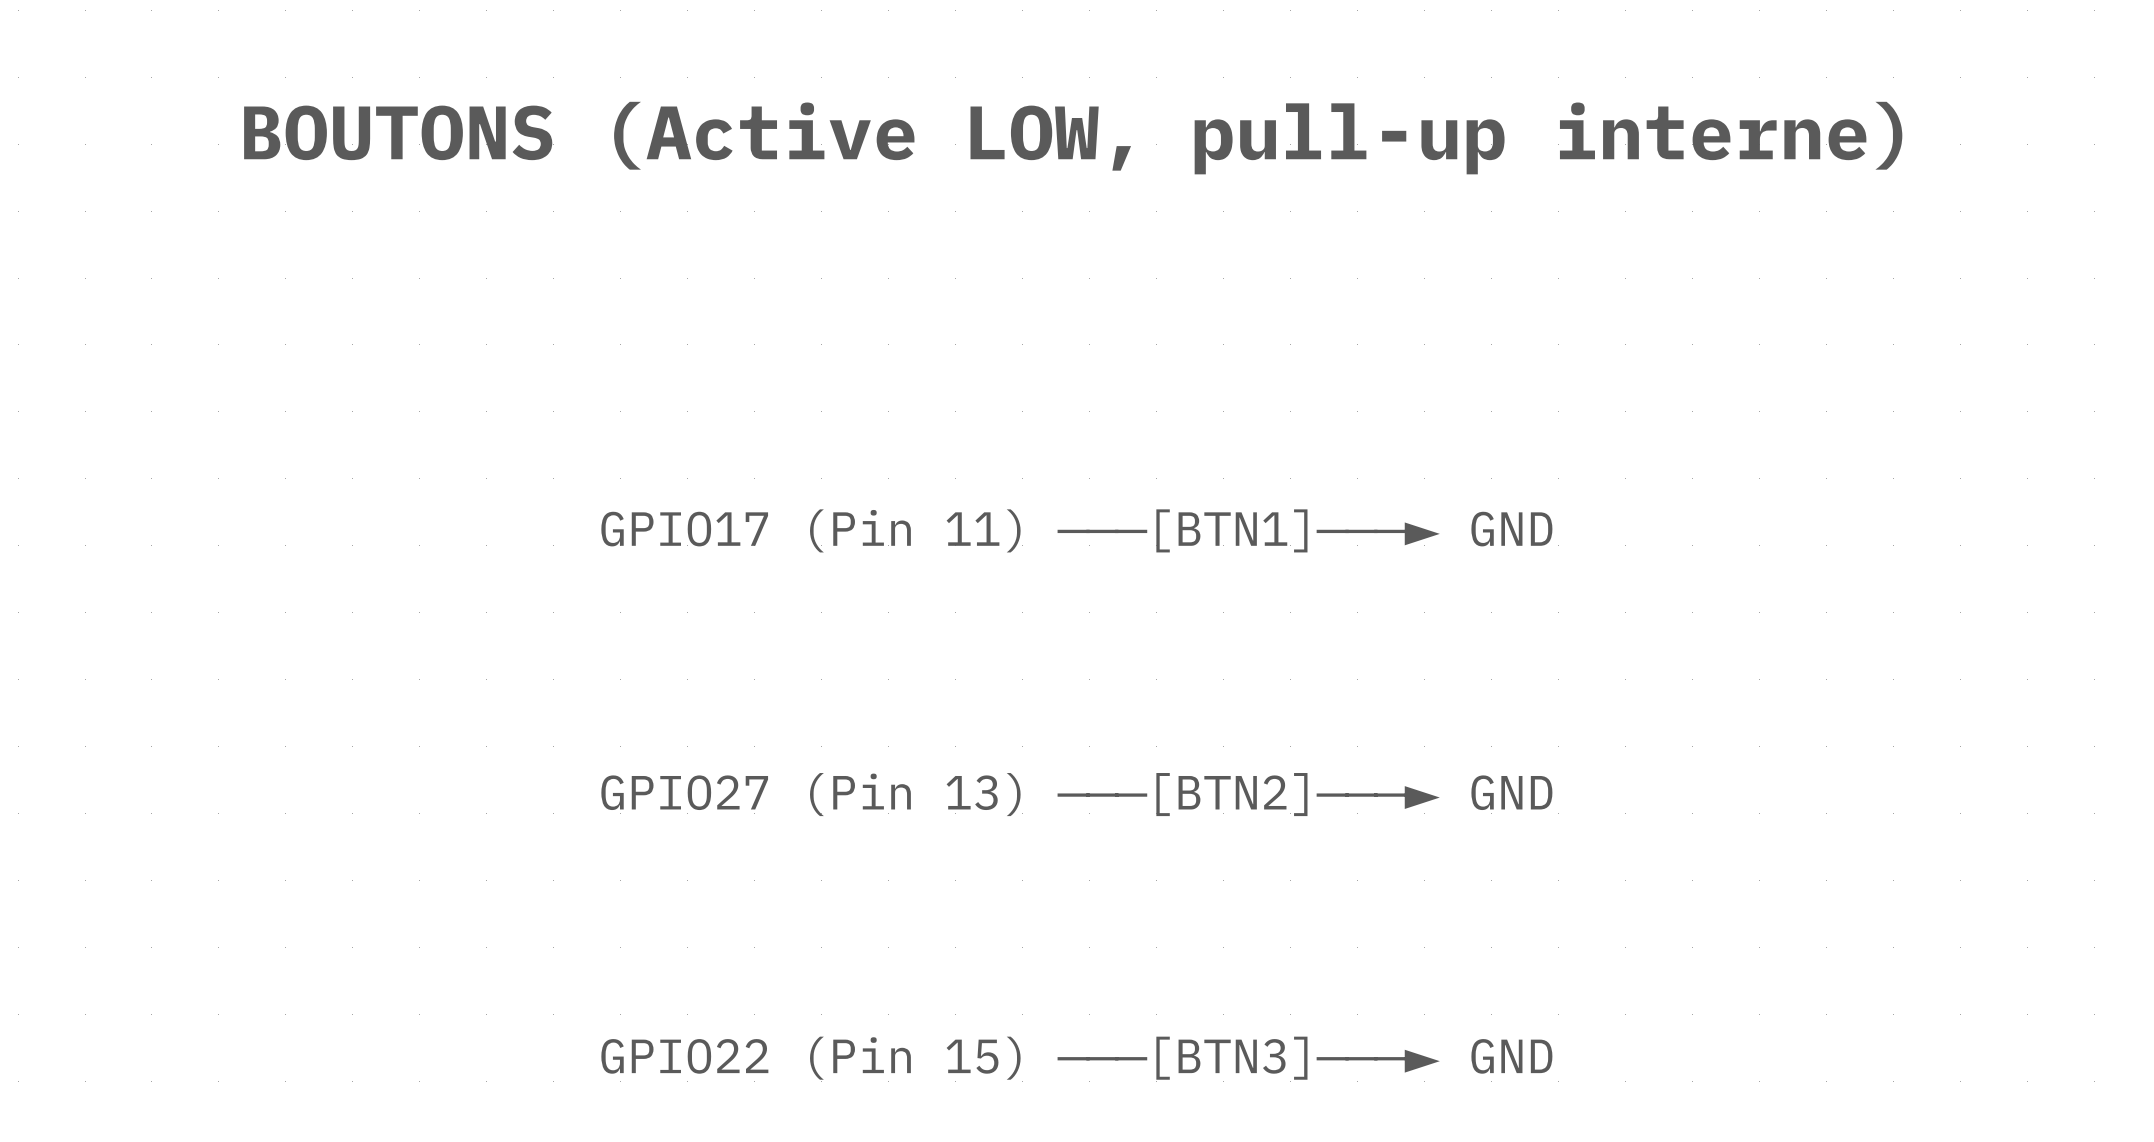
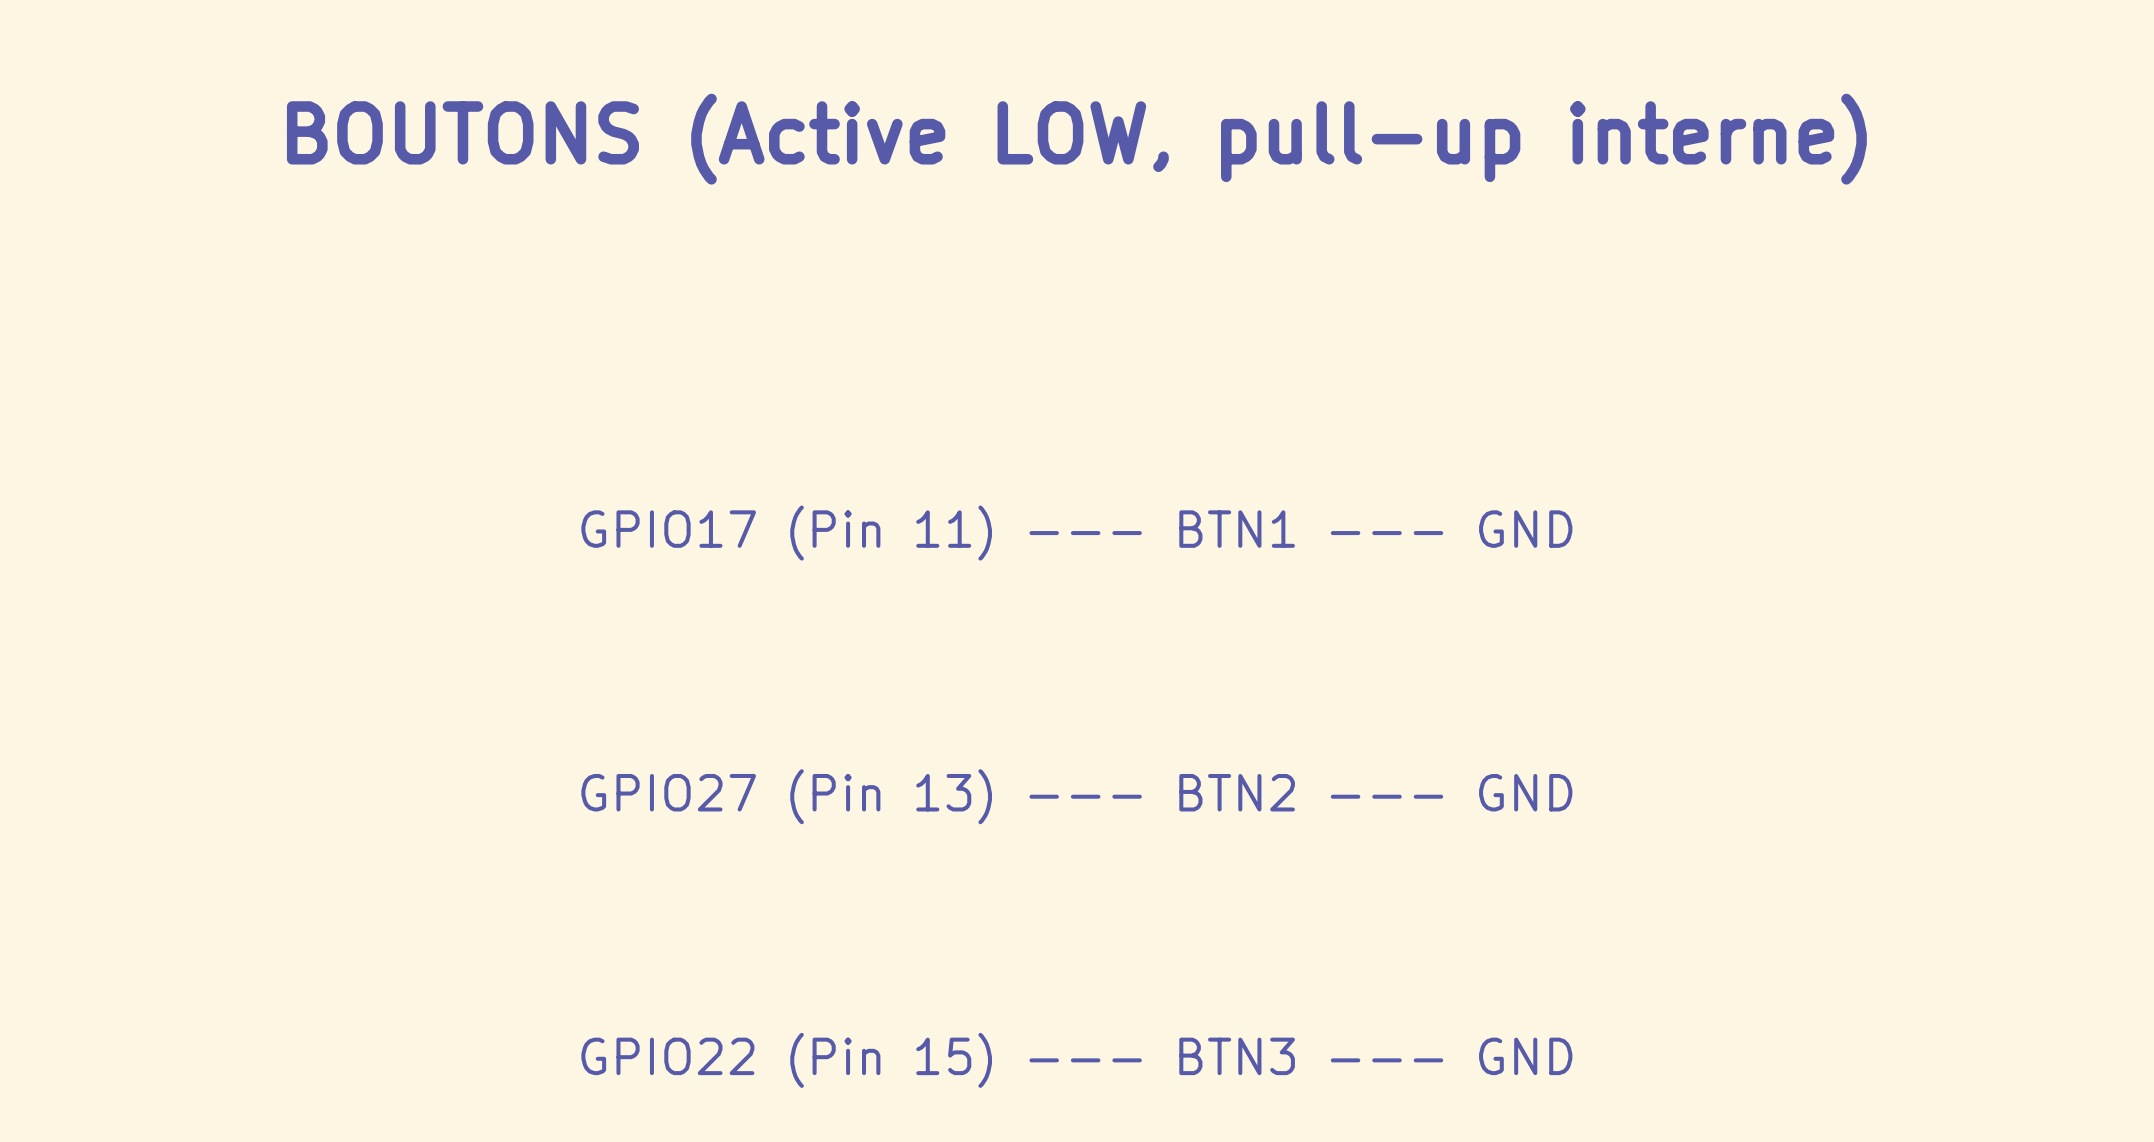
text: GPIO17 (Pin 11) ───[BTN1]───► GND (1076, 530) -> GPIO17 (Pin 11) --- BTN1 --- GND (1076, 533)
text: GPIO27 (Pin 13) ───[BTN2]───► GND (1076, 794) -> GPIO27 (Pin 13) --- BTN2 --- GND (1076, 796)
text: GPIO22 (Pin 15) ───[BTN3]───► GND (1076, 1058) -> GPIO22 (Pin 15) --- BTN3 --- GND (1076, 1060)

